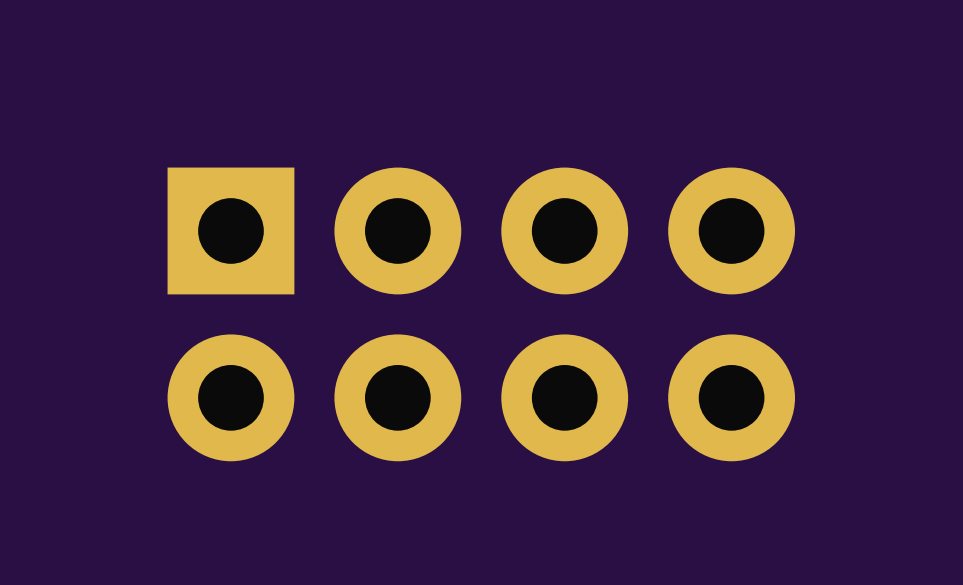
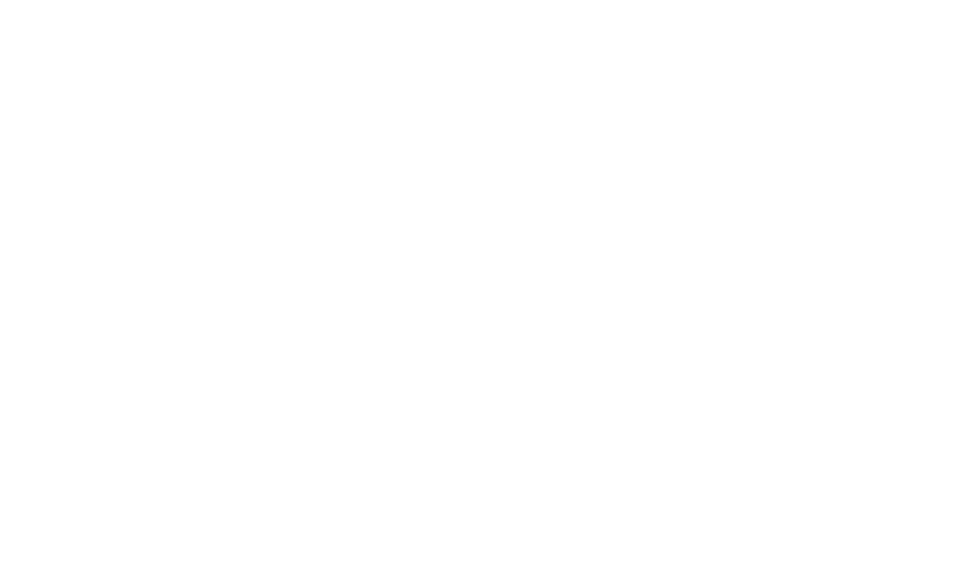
part: (481, 314) -> none

